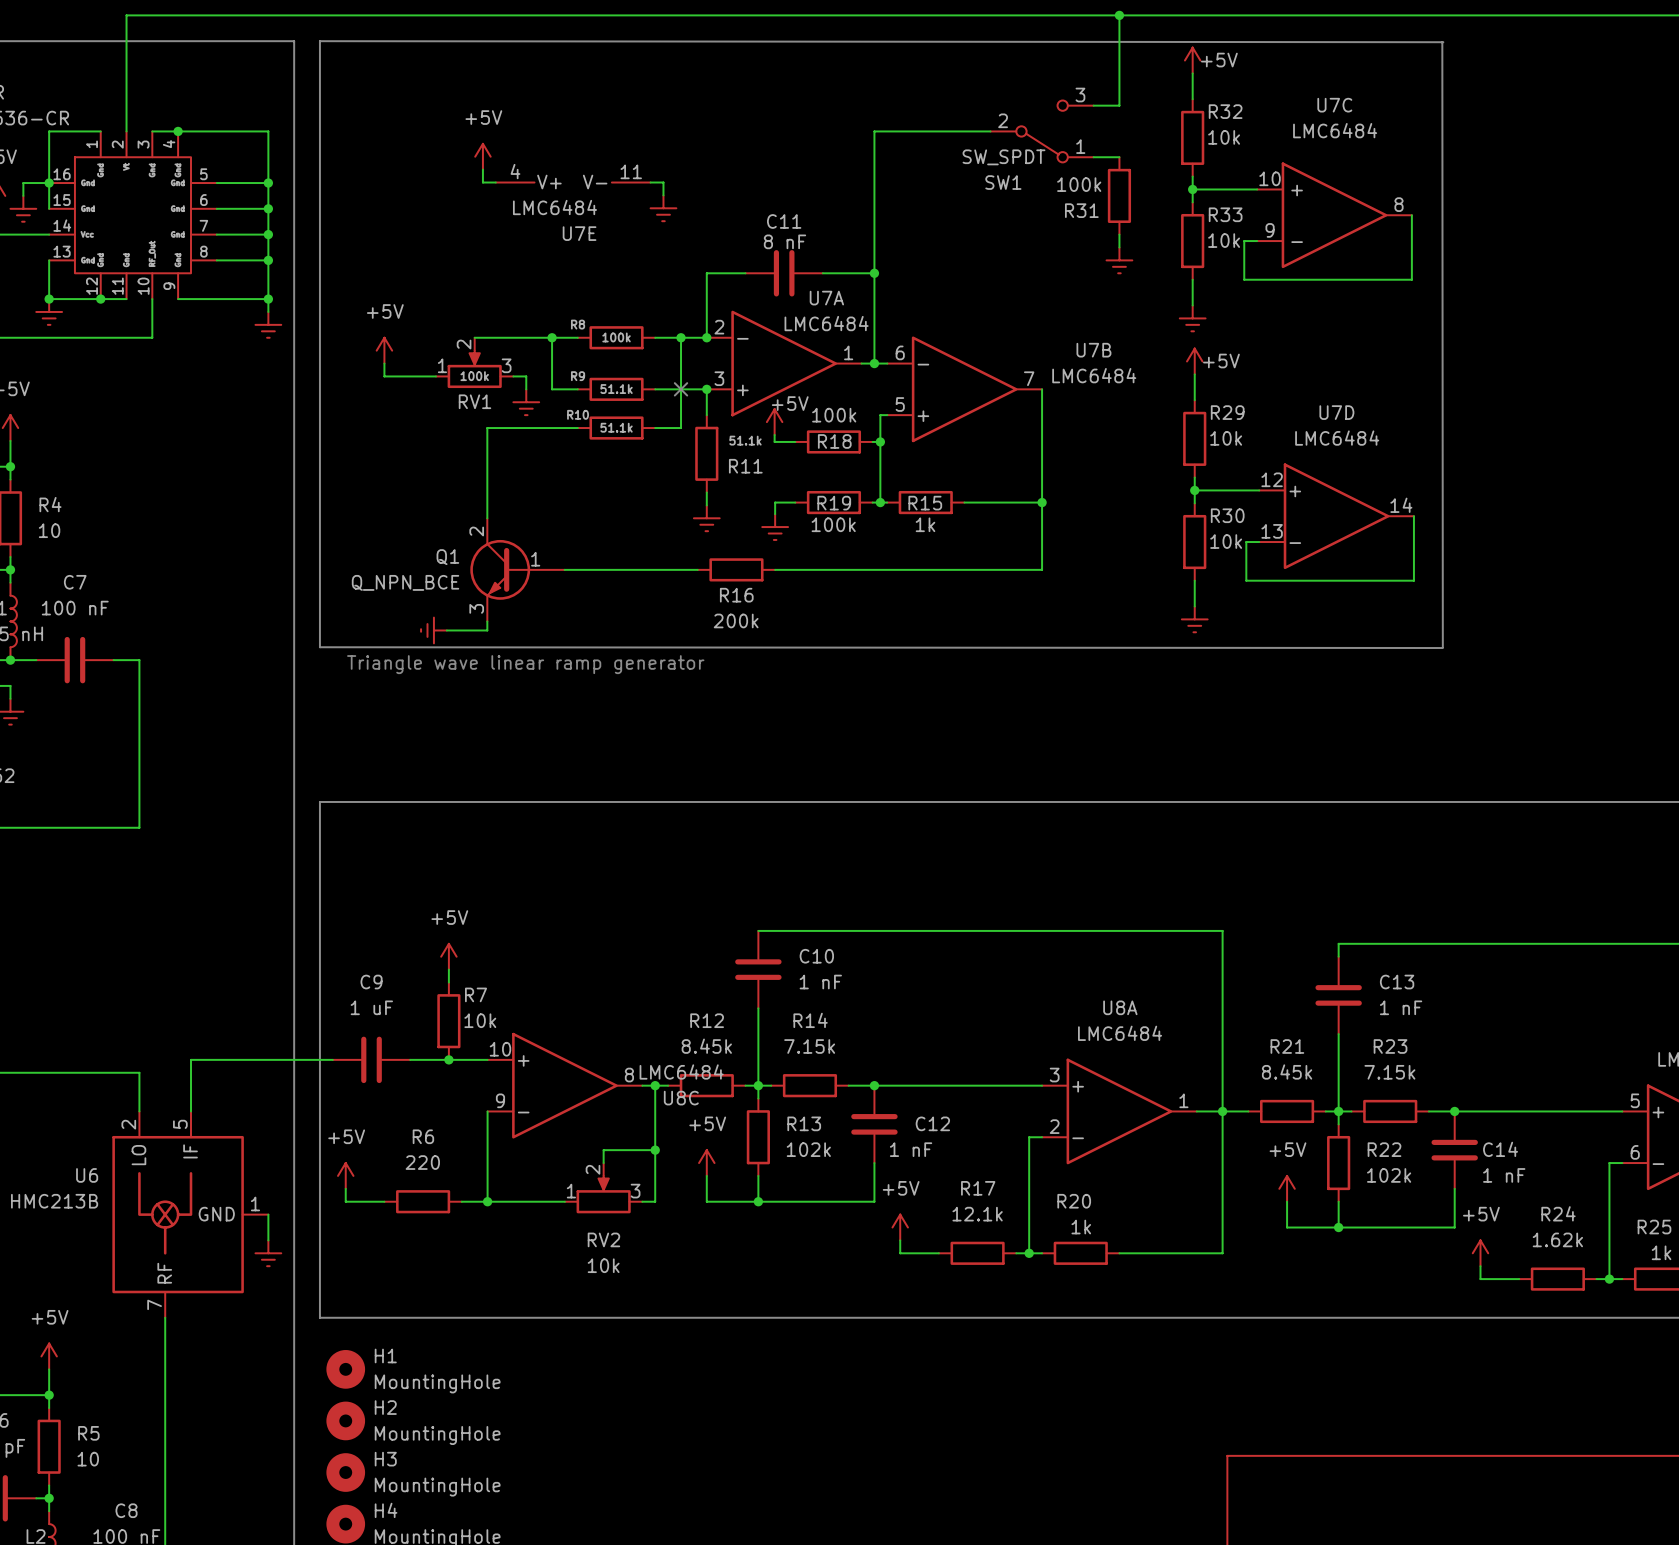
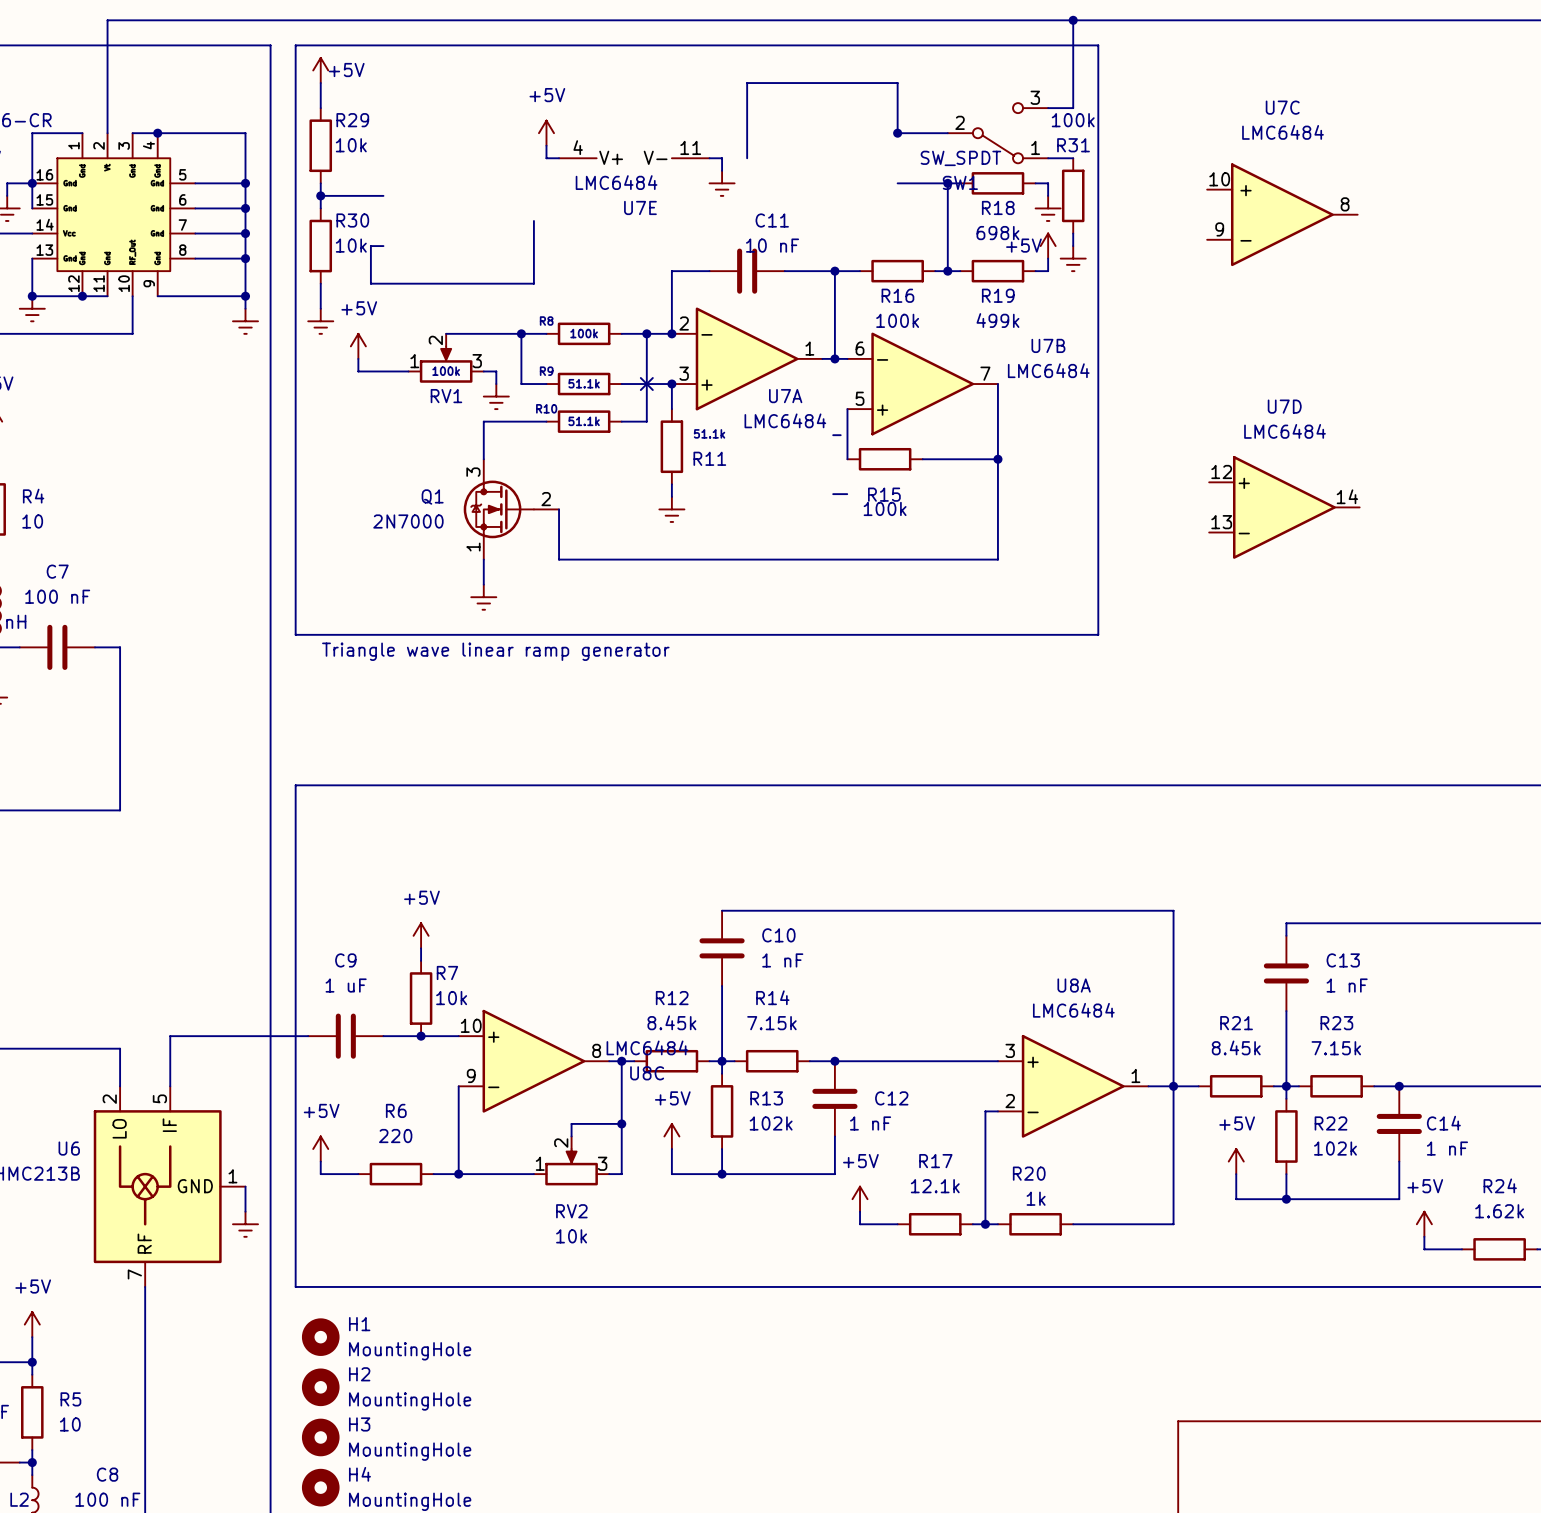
line: (319, 41) (1443, 42) -> (295, 45) (1098, 45) (1098, 634) (295, 634)
line: (1442, 42) (1442, 647) -> none
power symbol: +5V (1192, 60) -> none
power symbol: none -> +5V (320, 70)
wire: (1192, 73) (1192, 99) -> none
wire: none -> (320, 83) (320, 108)
power symbol: none -> +5V (546, 133)
wire: (938, 131) (874, 131) (874, 273) -> (860, 271) (834, 271)
wire: none -> (897, 133) (897, 83) (747, 83) (747, 158)
junction: none -> (897, 133)
R32: 10k (1192, 137) -> none
power symbol: +5V (482, 156) -> none
wire: (482, 169) (482, 182) (495, 182) -> (546, 145) (546, 158) (559, 158)
wire: (1192, 176) (1192, 202) -> none
U7E position: (573, 182) -> (634, 158)
wire: (650, 182) (663, 182) (663, 195) -> (709, 158) (722, 158) (722, 170)
wire: none -> (320, 183) (320, 208)
wire: none -> (897, 183) (960, 183)
wire: none -> (947, 183) (947, 271)
junction: none -> (947, 183)
wire: none -> (1035, 183) (1048, 183) (1048, 195)
R31 value position: 100k (1079, 184) -> 100k (1073, 120)
wire: (1192, 189) (1257, 189) -> none
junction: (1192, 189) -> none
wire: none -> (320, 195) (383, 195)
junction: none -> (320, 195)
power symbol position: (663, 208) -> (722, 183)
R31 name position: R31 (1081, 210) -> R31 (1073, 145)
wire: (1411, 215) (1411, 279) (1244, 279) (1244, 241) (1257, 241) -> none
wire: none -> (533, 220) (533, 283) (370, 283) (370, 246) (383, 246)
C11 name position: C11 (784, 221) -> C11 (772, 220)
C11 value: 8 nF (784, 241) -> 10 nF (772, 245)
R33: 10k (1192, 241) -> none
power symbol: none -> +5V (1048, 246)
wire: none -> (1048, 258) (1048, 271) (1035, 271)
wire: none -> (935, 271) (960, 271)
junction: none -> (947, 271)
wire: (1192, 279) (1192, 305) -> none
wire: none -> (320, 283) (320, 308)
U7A name position: U7A (826, 298) -> U7A (785, 396)
power symbol position: (1192, 318) -> (1048, 208)
U7A value position: LMC6484 (826, 323) -> LMC6484 (785, 420)
power symbol: none -> (320, 321)
power symbol: +5V (1194, 361) -> none
wire: (1194, 374) (1194, 400) -> none
R18 value: 100k (834, 415) -> 698k (997, 233)
wire: (887, 415) (880, 415) (880, 502) -> (847, 409) (847, 459)
power symbol: +5V (774, 422) -> none
wire: (513, 428) (487, 428) (487, 518) -> (483, 421) (483, 459)
wire: (774, 434) (774, 441) (795, 441) -> none
R29 position: (1194, 438) -> (320, 145)
R18 position: (833, 441) -> (997, 183)
R18 name position: R18 (834, 441) -> R18 (998, 207)
junction: (880, 441) -> none
wire: none -> (922, 459) (997, 459)
wire: (1194, 477) (1194, 503) -> none
wire: (1194, 490) (1259, 490) -> none
junction: (1194, 490) -> none
wire: (795, 502) (775, 502) (775, 514) -> none
R19 position: (833, 502) -> (997, 271)
junction: (880, 502) -> none
R15 position: (925, 502) -> (885, 459)
wire: (964, 502) (1042, 502) -> none
junction position: (1042, 502) -> (997, 459)
R19 name position: R19 (834, 503) -> R19 (998, 295)
wire: (1413, 516) (1413, 580) (1246, 580) (1246, 542) (1259, 542) -> none
Q1 symbol: [470, 518, 565, 622] -> [463, 459, 560, 560]
R19 value: 100k (833, 524) -> 499k (997, 320)
R15 value: 1k (925, 524) -> 100k (885, 508)
power symbol: (775, 527) -> none
R30 position: (1194, 542) -> (320, 246)
wire: none -> (483, 559) (483, 584)
wire: (564, 569) (590, 569) -> (559, 509) (559, 559)
wire: none -> (663, 559) (738, 559)
R16 position: (736, 569) -> (897, 271)
wire: (1194, 580) (1194, 606) -> none
Q1 value: Q_NPN_BCE (405, 582) -> 2N7000 (408, 521)
power symbol: (1194, 619) -> none
R16 value: 200k (736, 620) -> 100k (897, 320)
wire: (487, 621) (487, 630) (446, 630) -> none
power symbol rotation: 0° (433, 630) -> 90° counterclockwise (483, 597)
power symbol position: (433, 630) -> (483, 597)
line: (319, 647) (1442, 648) -> none

